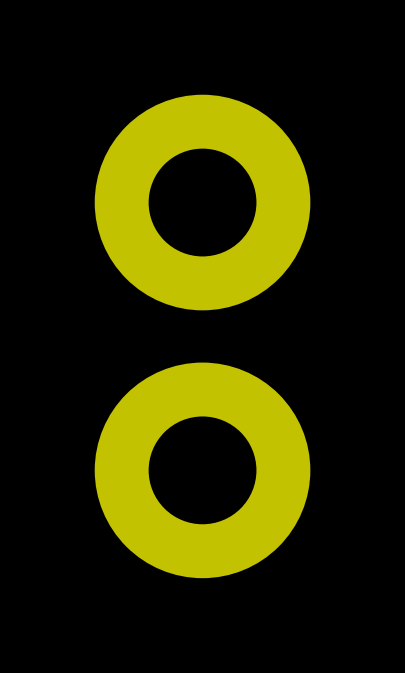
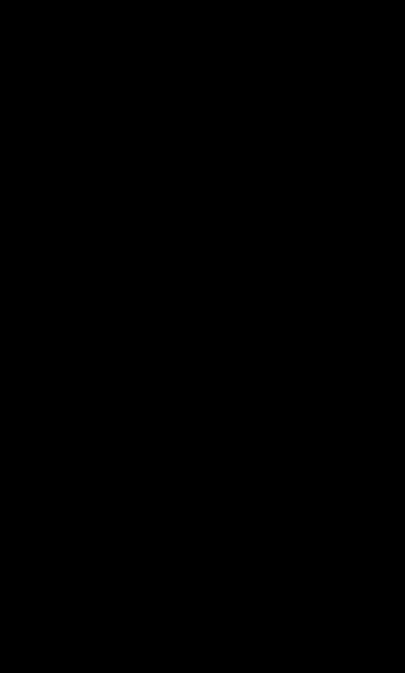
part: (202, 202) -> none
part: (202, 470) -> none

